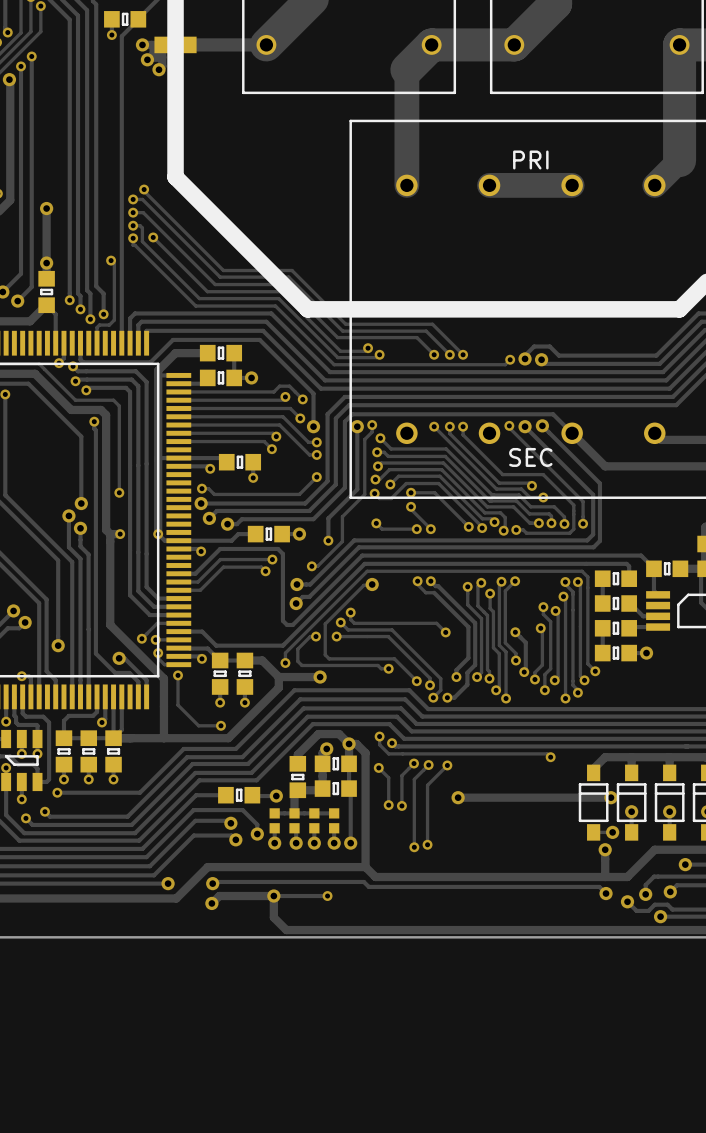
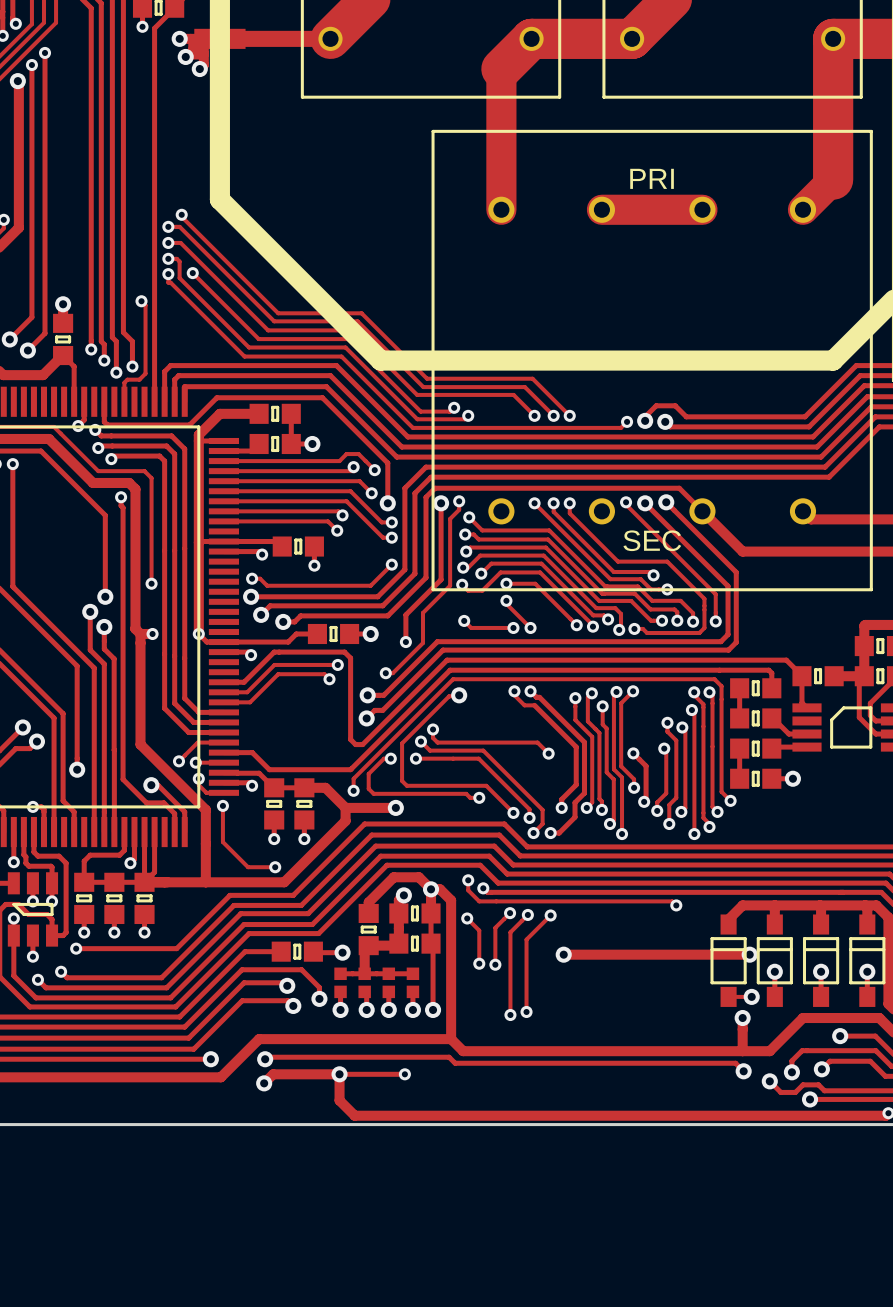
track: (46, 208) (46, 263) -> none
via: (46, 208) -> none

